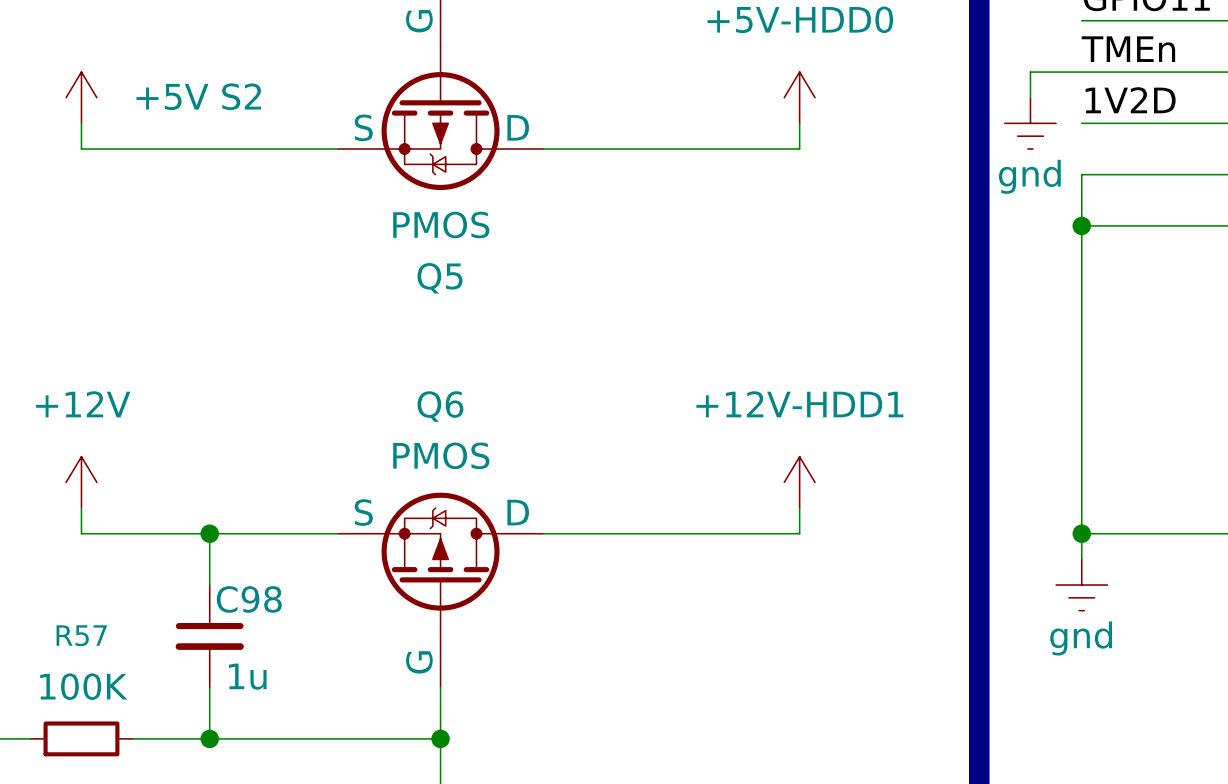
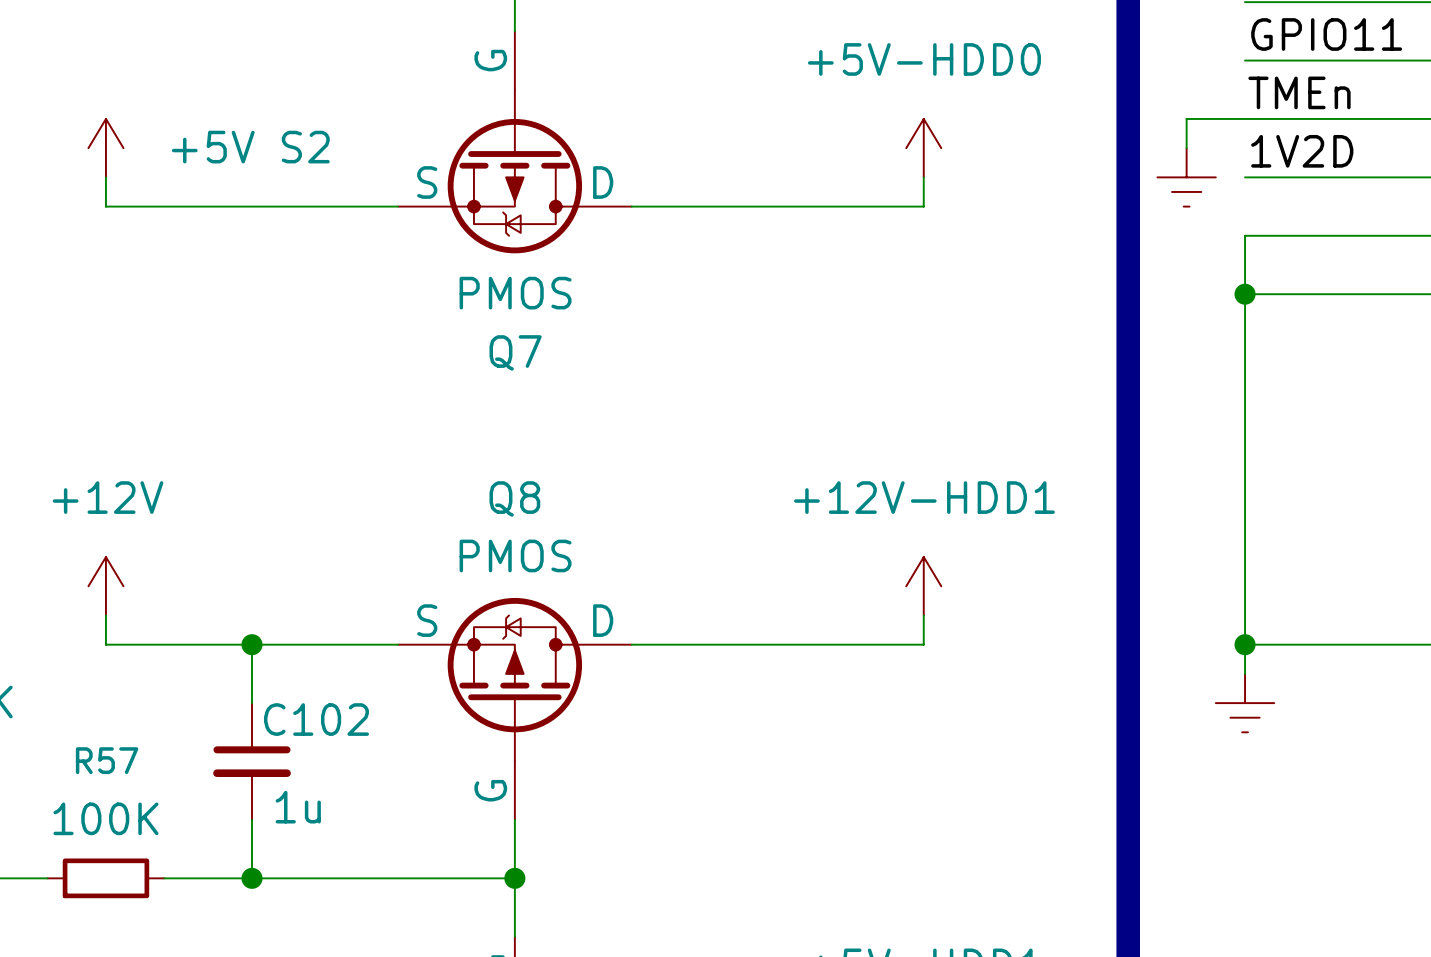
power symbol text: gnd (1029, 176) -> none
Q5 name: Q5 (440, 278) -> Q7 (515, 352)
Q6 name: Q6 (440, 406) -> Q8 (514, 498)
C98 name: C98 (249, 599) -> C102 (316, 719)
power symbol text: gnd (1081, 638) -> none

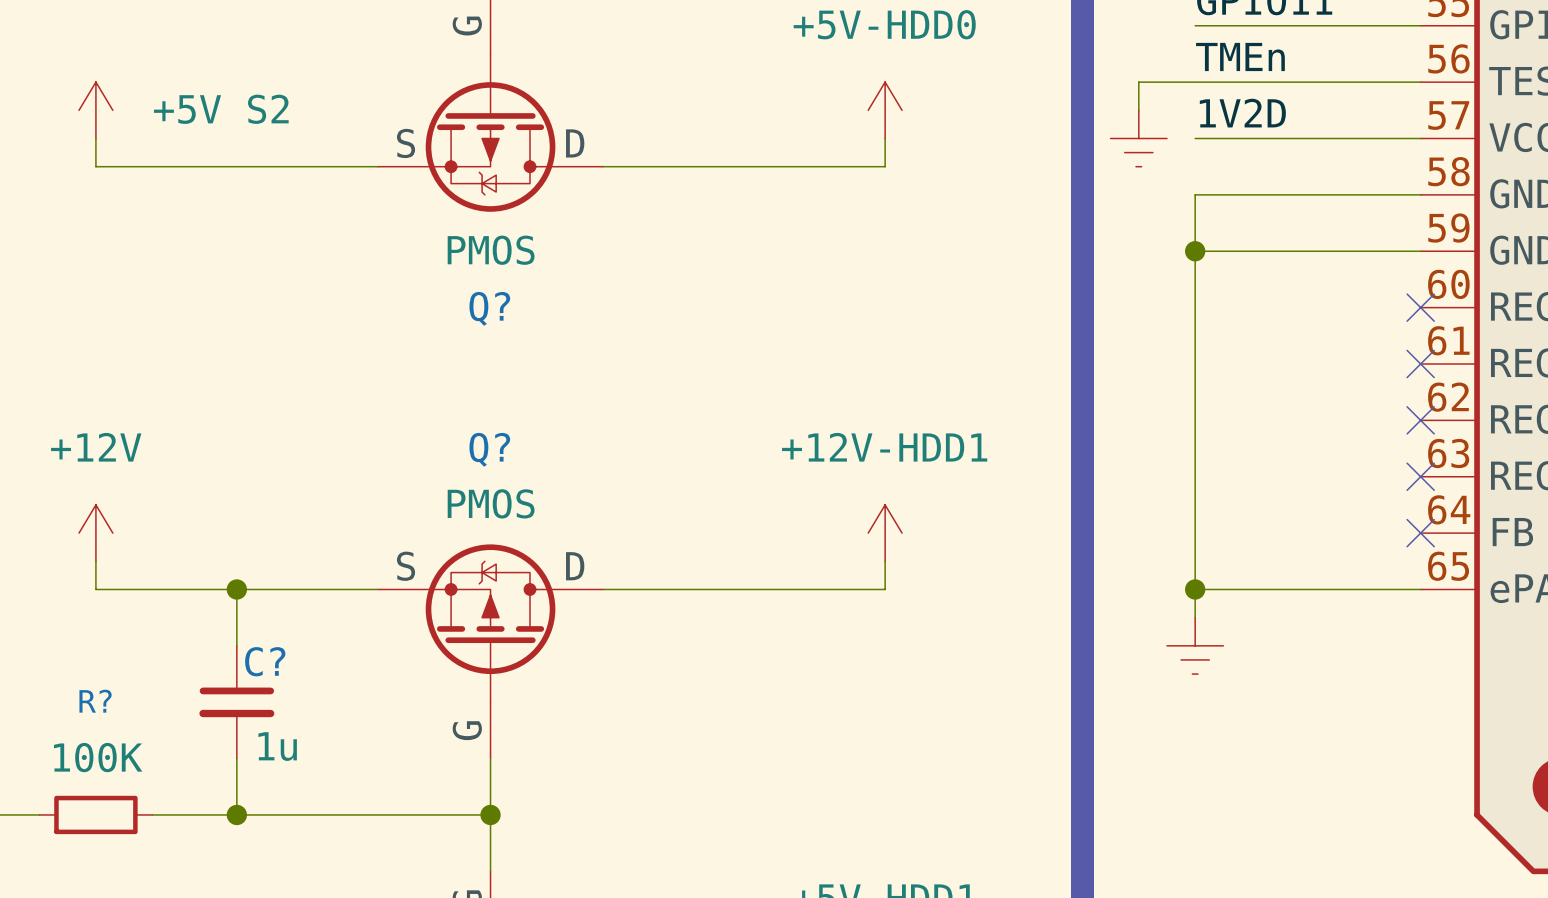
Q7 name: Q7 (515, 352) -> Q? (489, 308)
Q8 name: Q8 (514, 498) -> Q? (489, 449)
C102 name: C102 (316, 719) -> C? (265, 661)
R57 name: R57 (107, 760) -> R? (95, 701)

